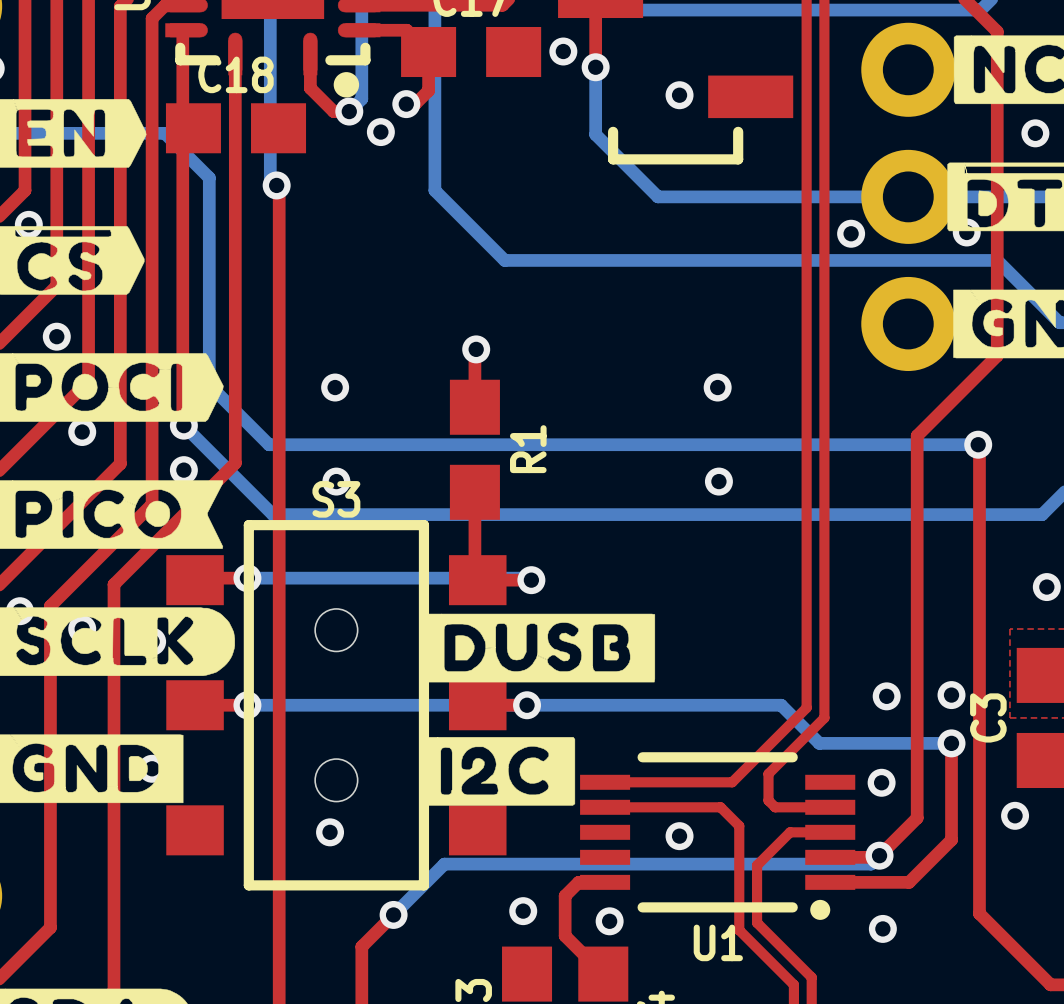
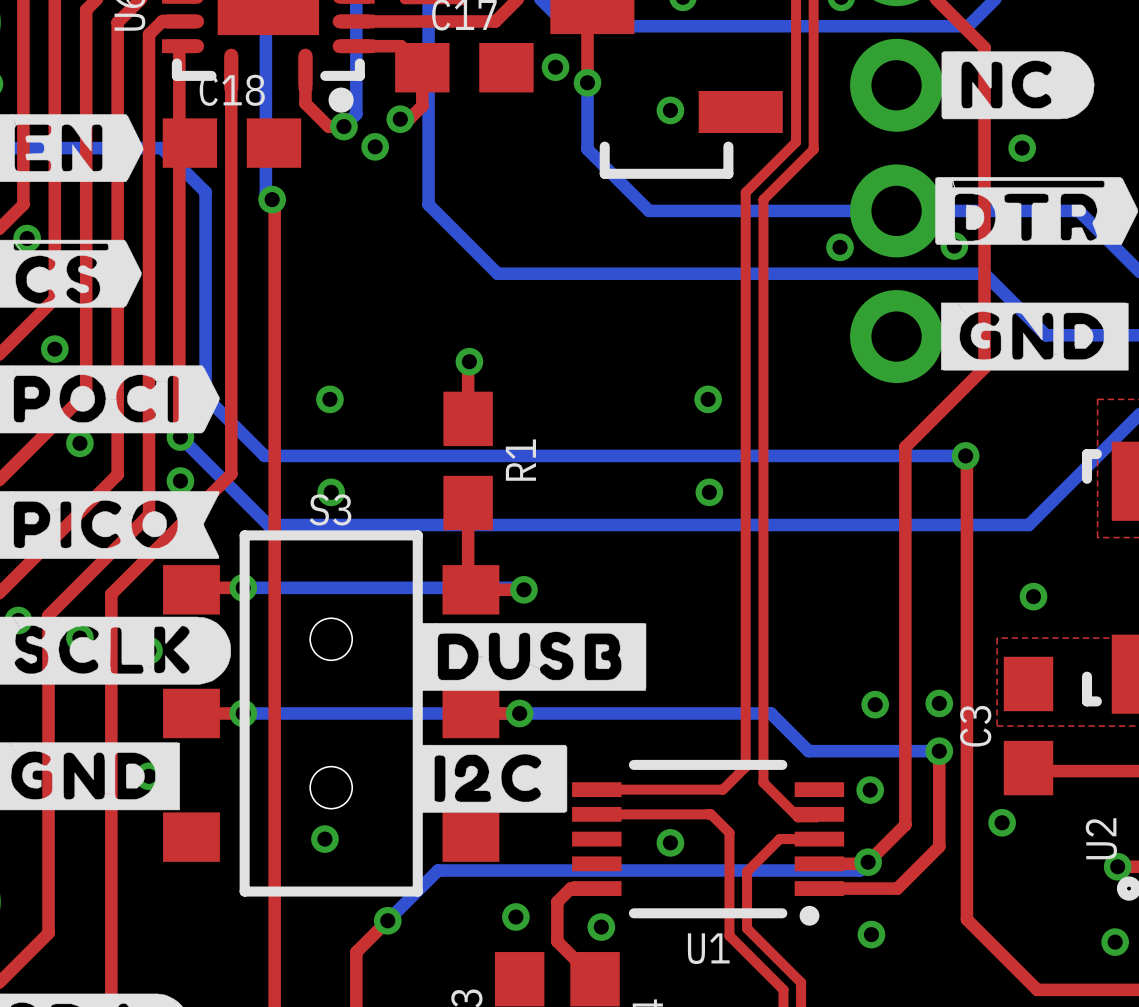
top track: (806, 127) (806, 707) (755, 759) -> (796, 142) (745, 192) (745, 766)
top track: (824, 134) (824, 717) (768, 773) (768, 800) (775, 807) (830, 807) -> (813, 149) (763, 199) (763, 782) (798, 817) (816, 817) (819, 814)

